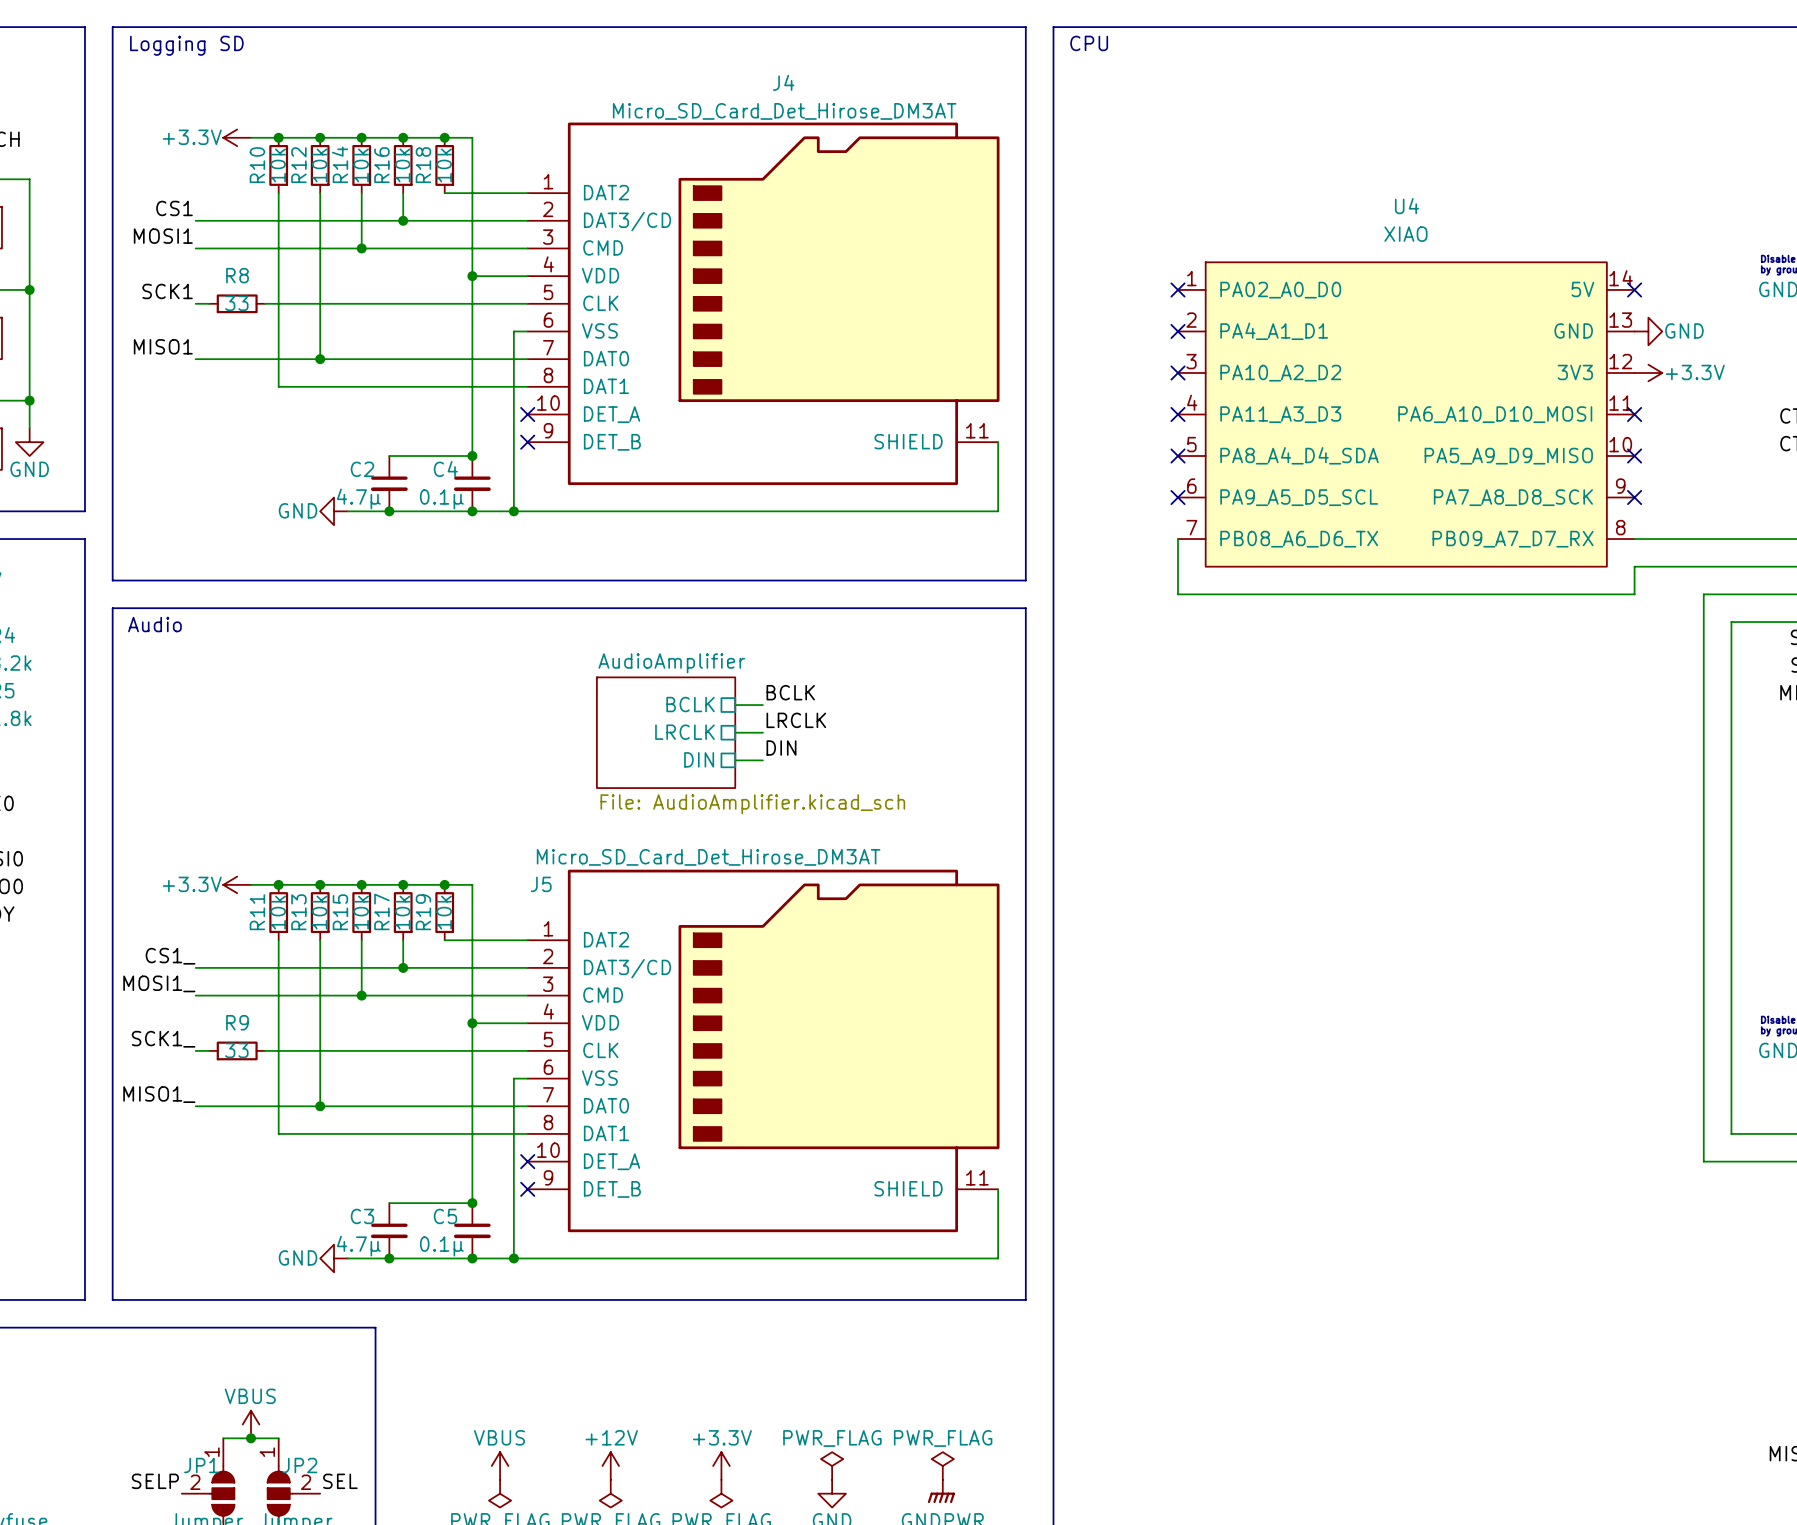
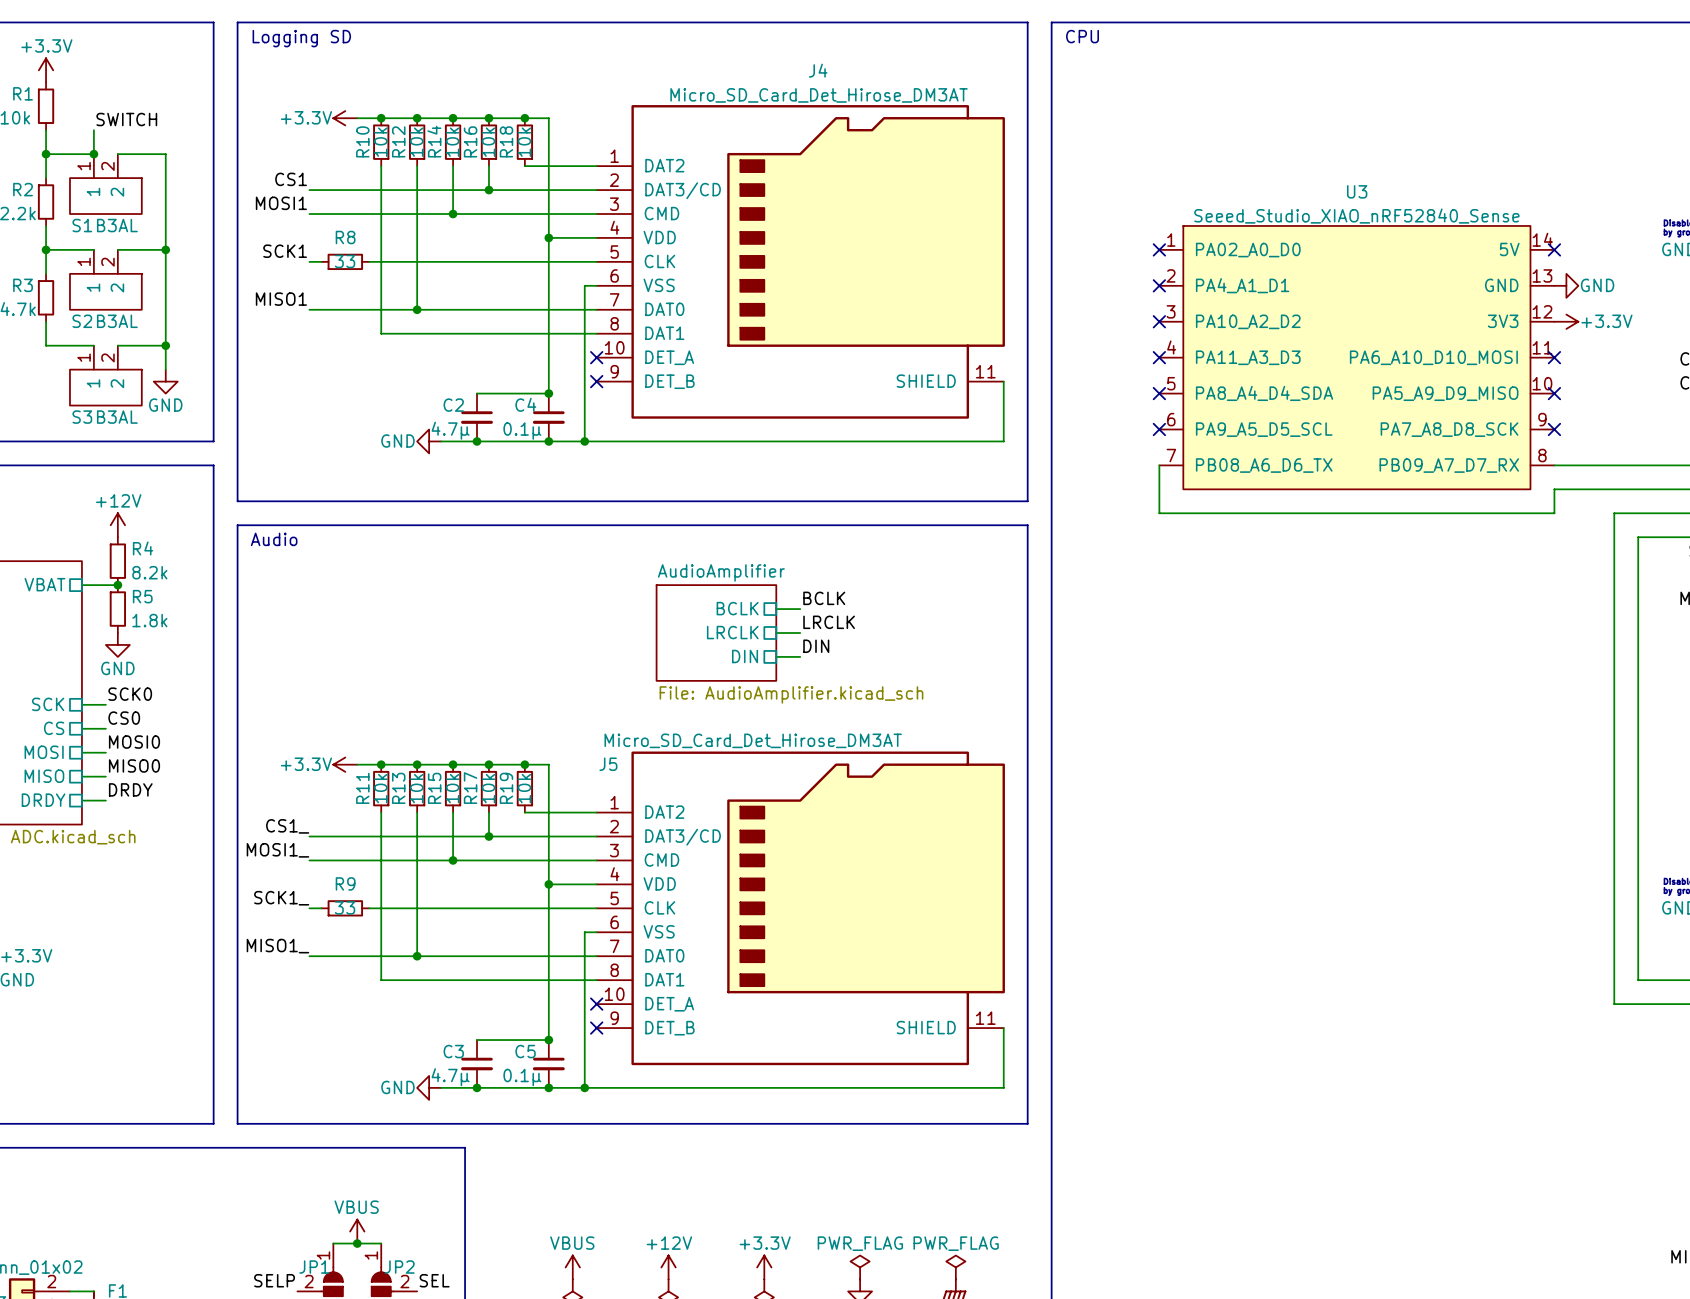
U4 name: U4 (1406, 206) -> U3 (1357, 191)
U4 value: XIAO (1405, 234) -> Seeed_Studio_XIAO_nRF52840_Sense (1356, 216)

